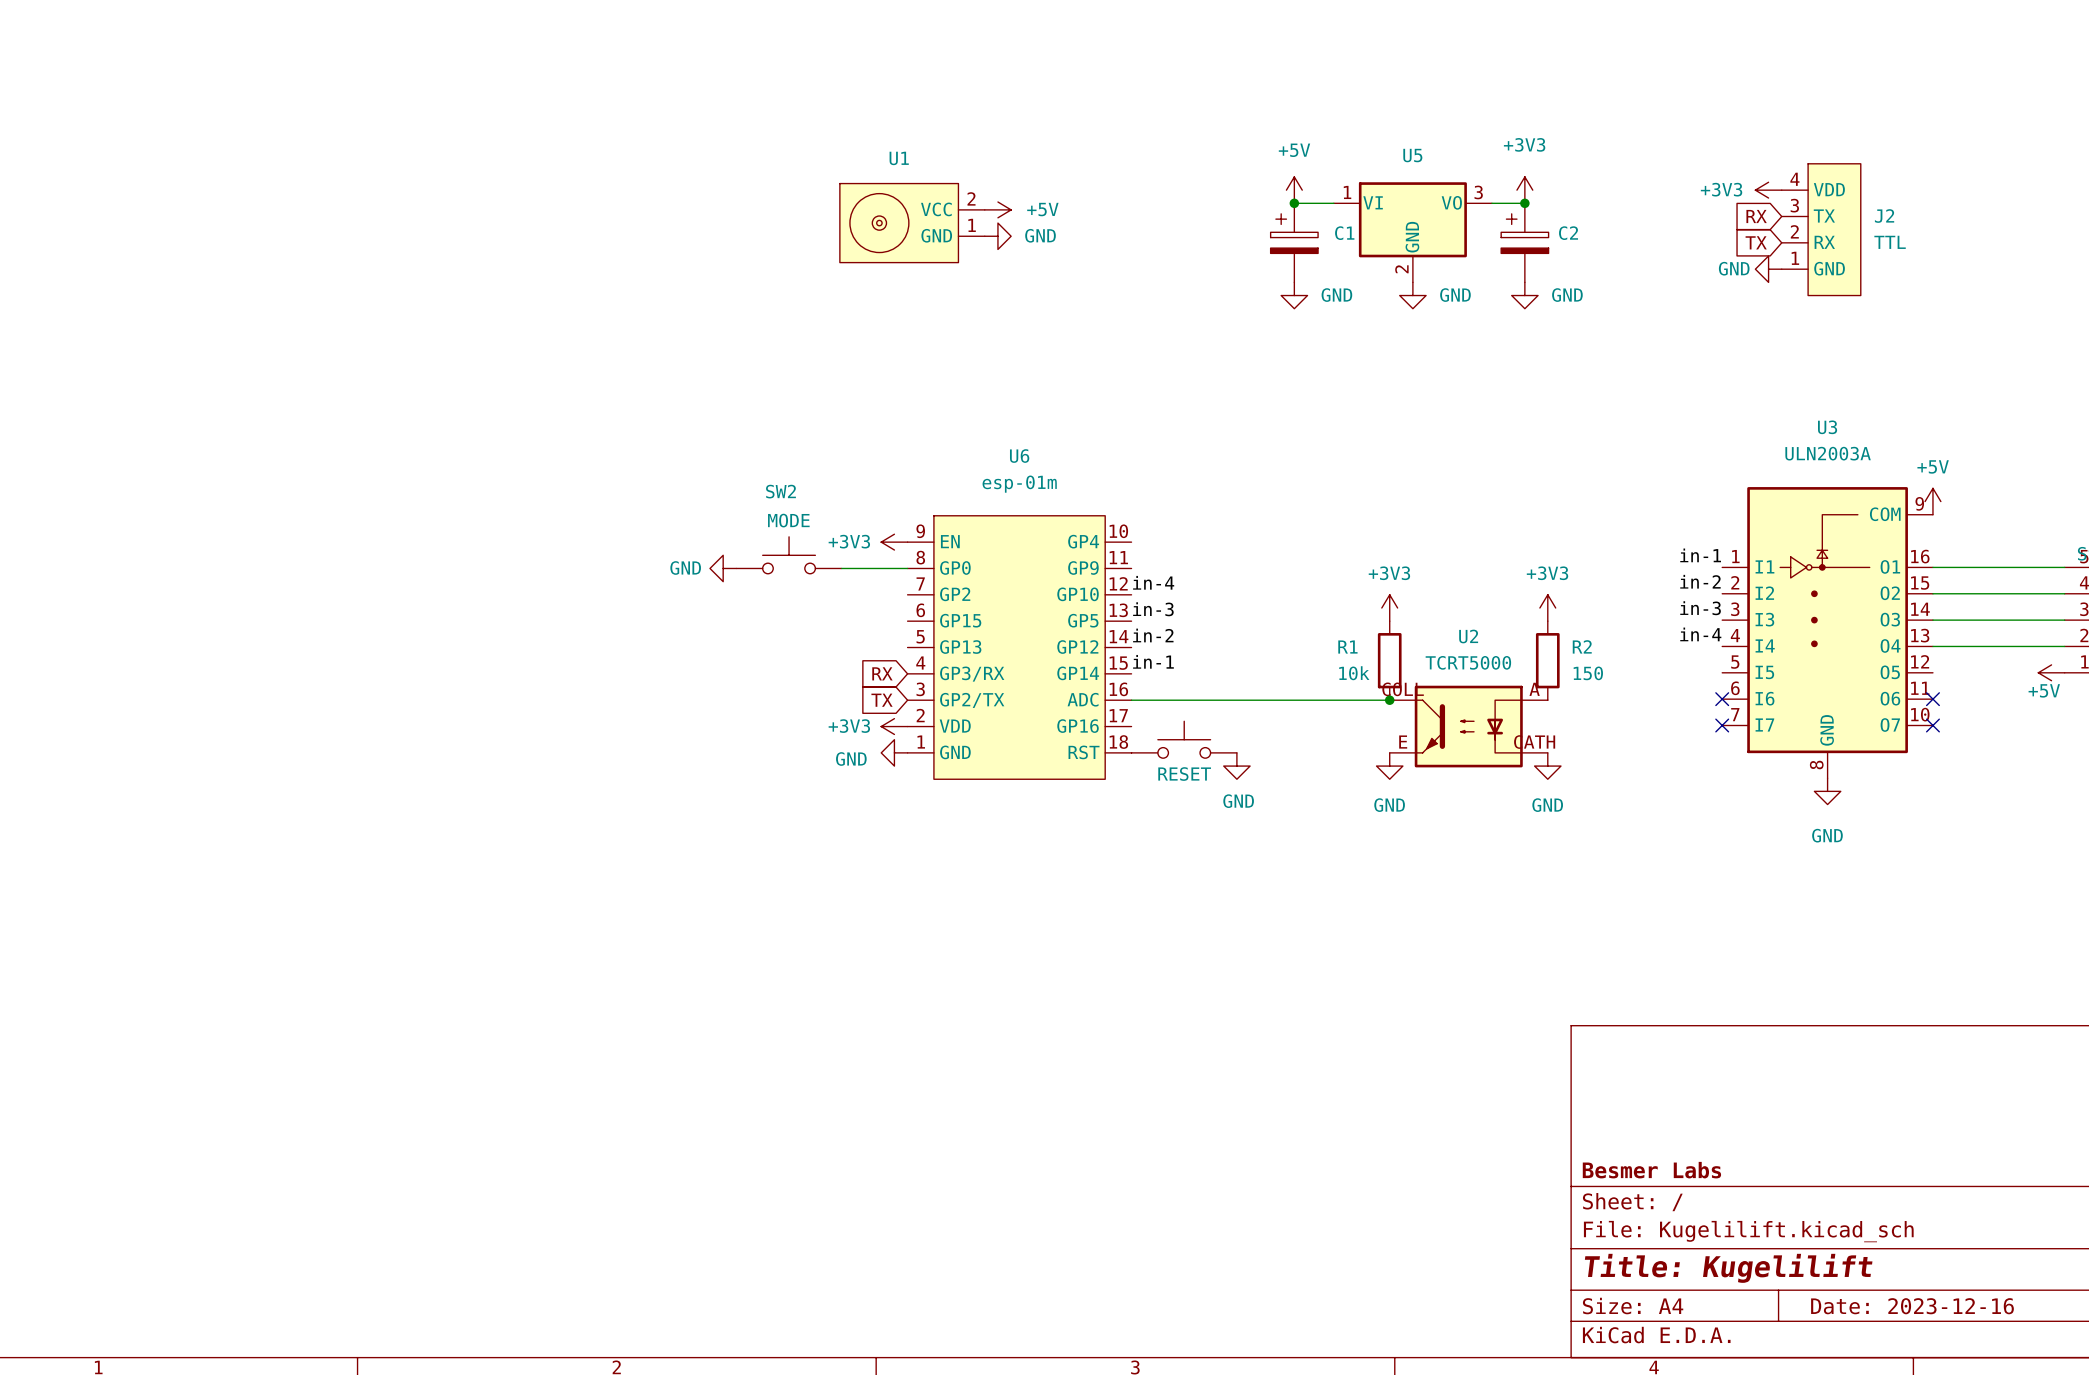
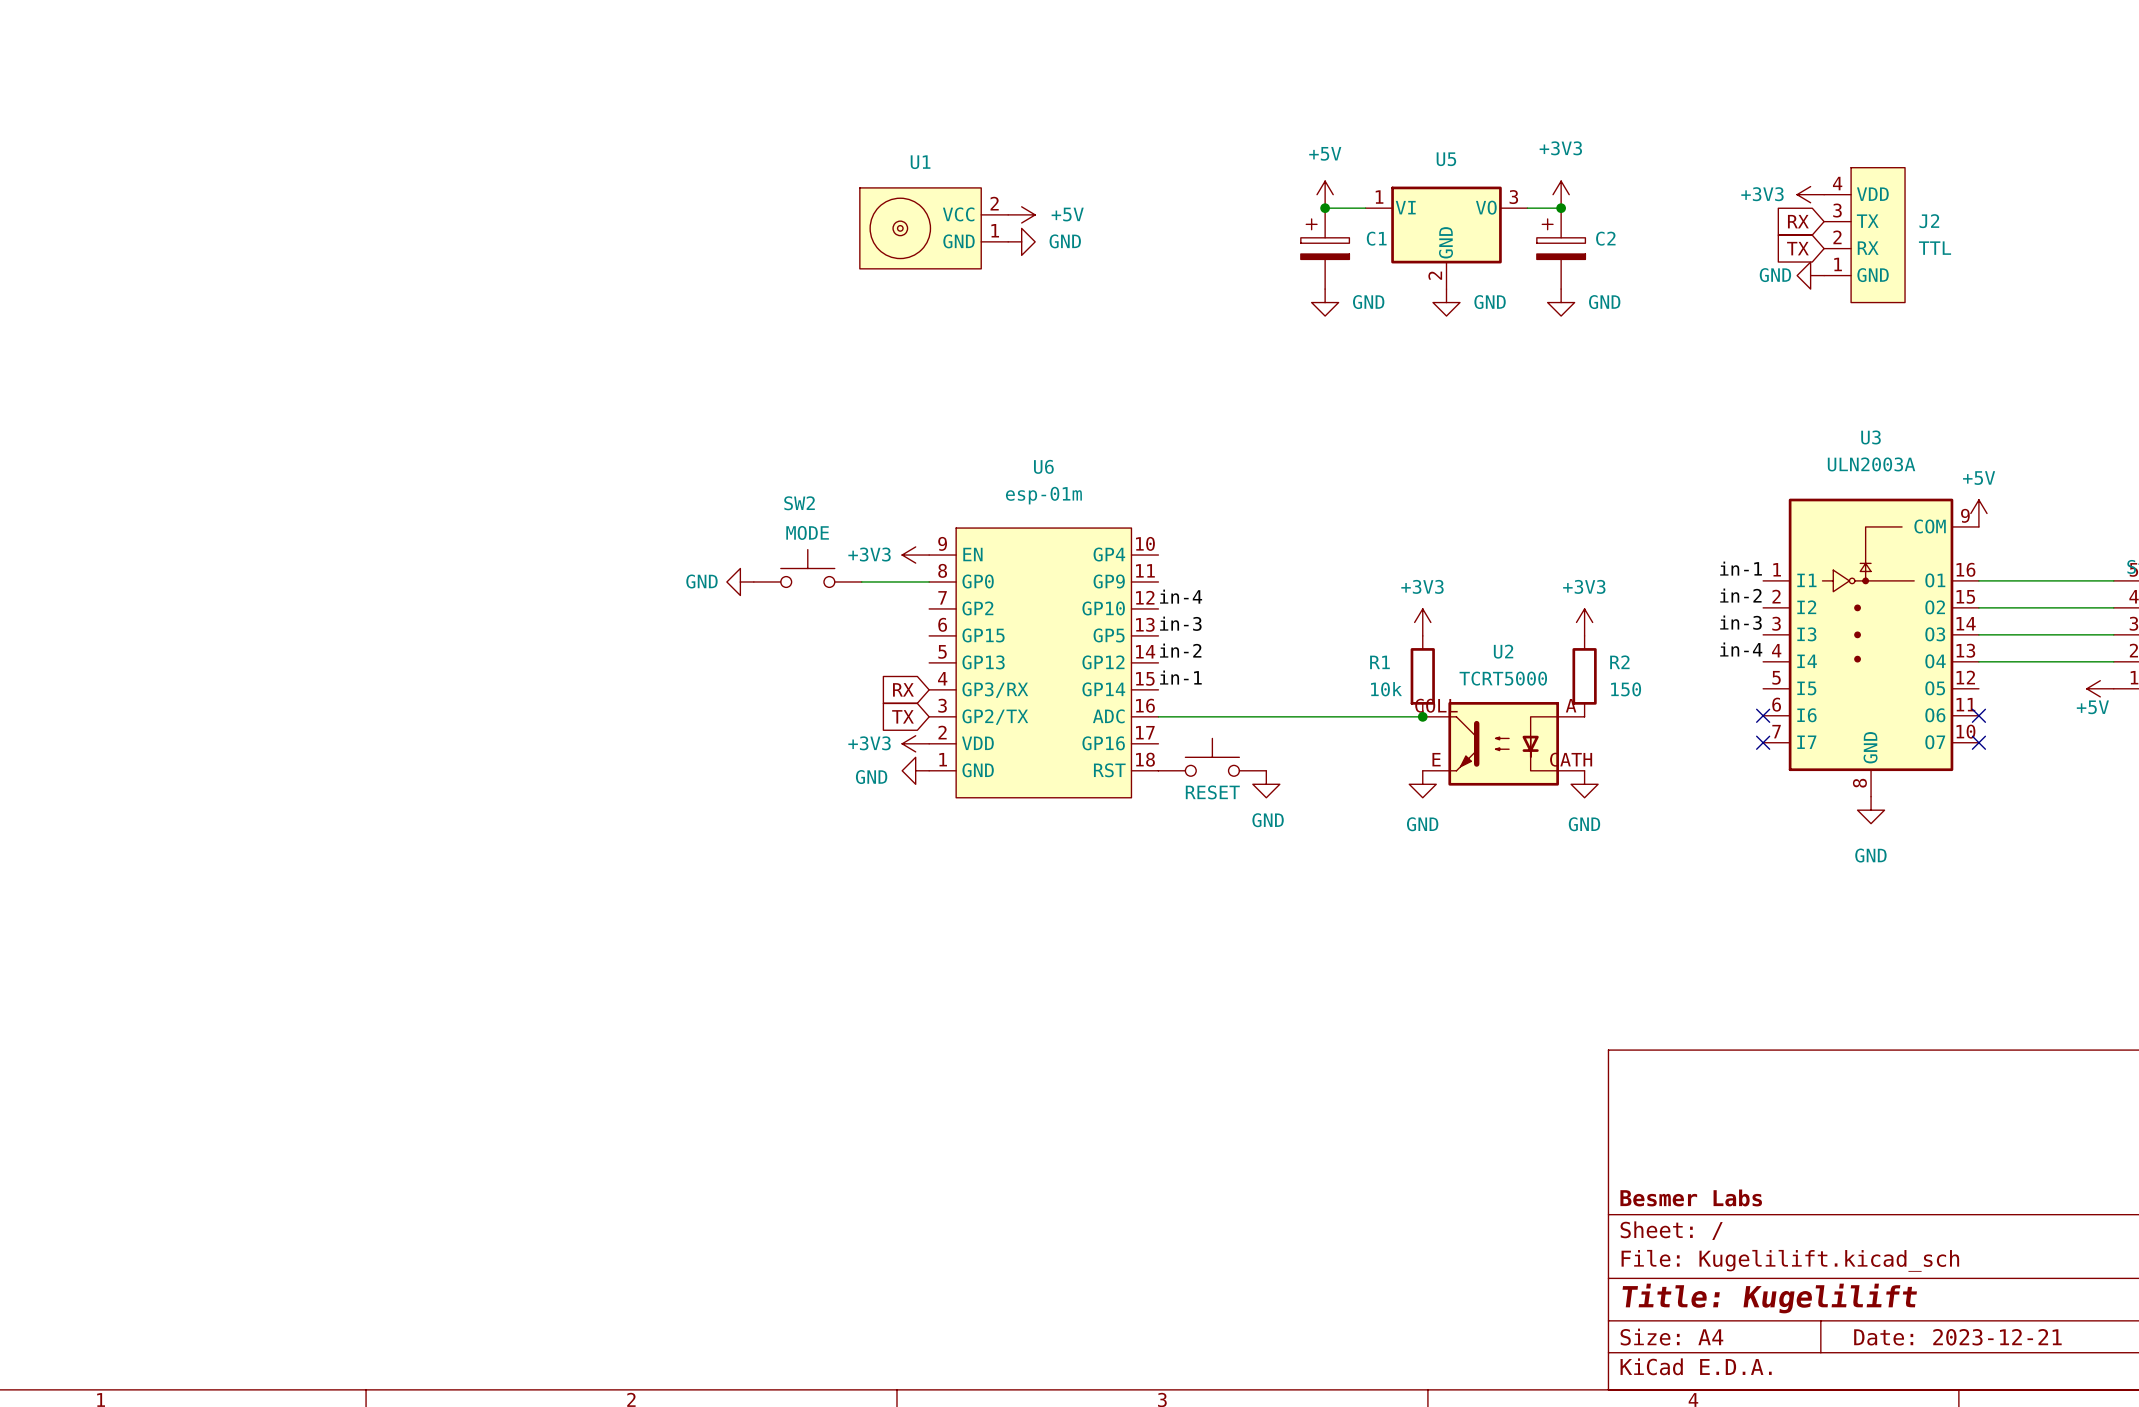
title block: Date: 2023-12-16 (1912, 1306) -> Date: 2023-12-21 (1957, 1337)

